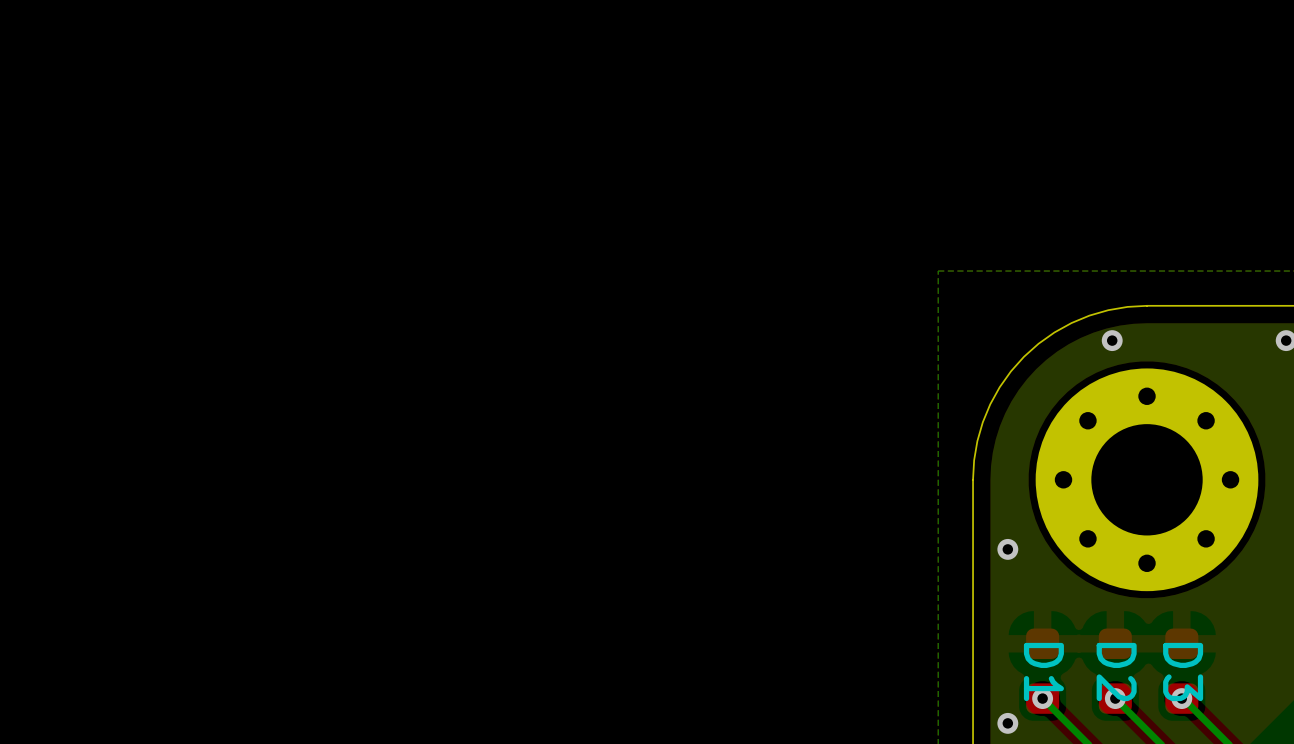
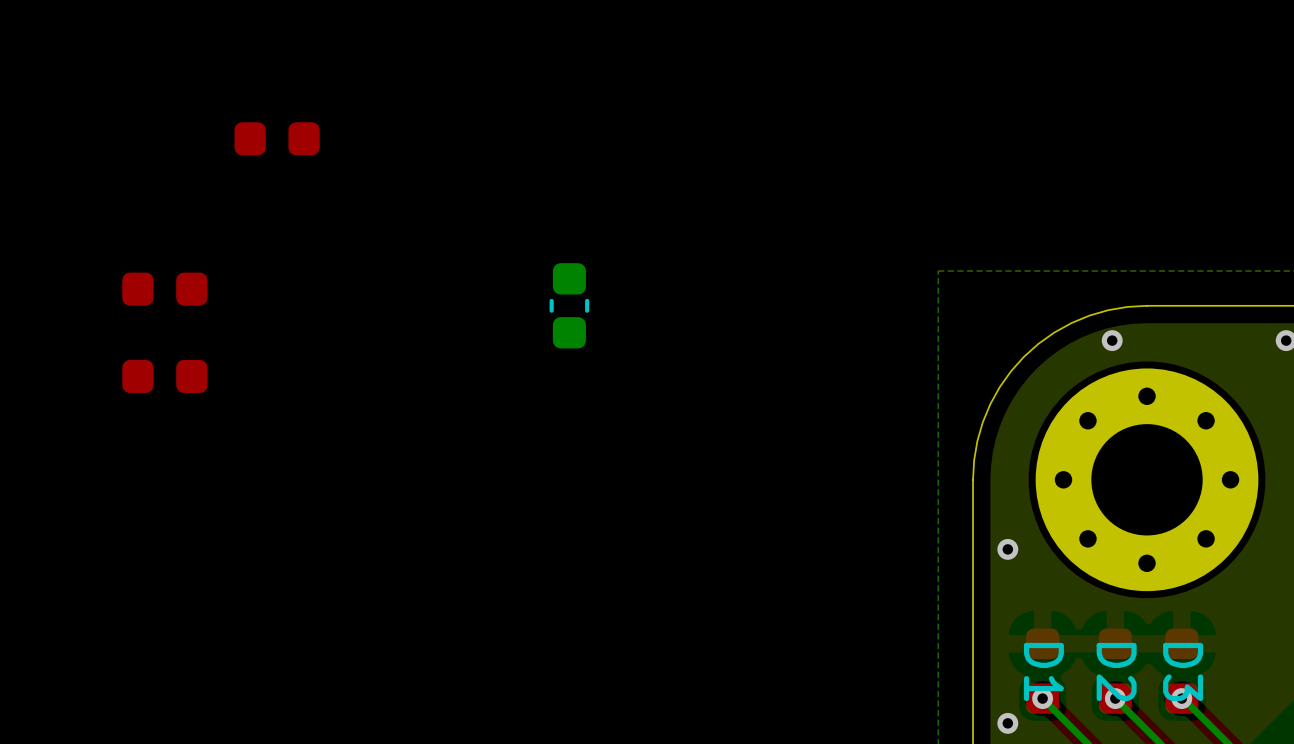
part: none -> (277, 138)
part: none -> (164, 289)
part: none -> (569, 305)
part: none -> (164, 376)

